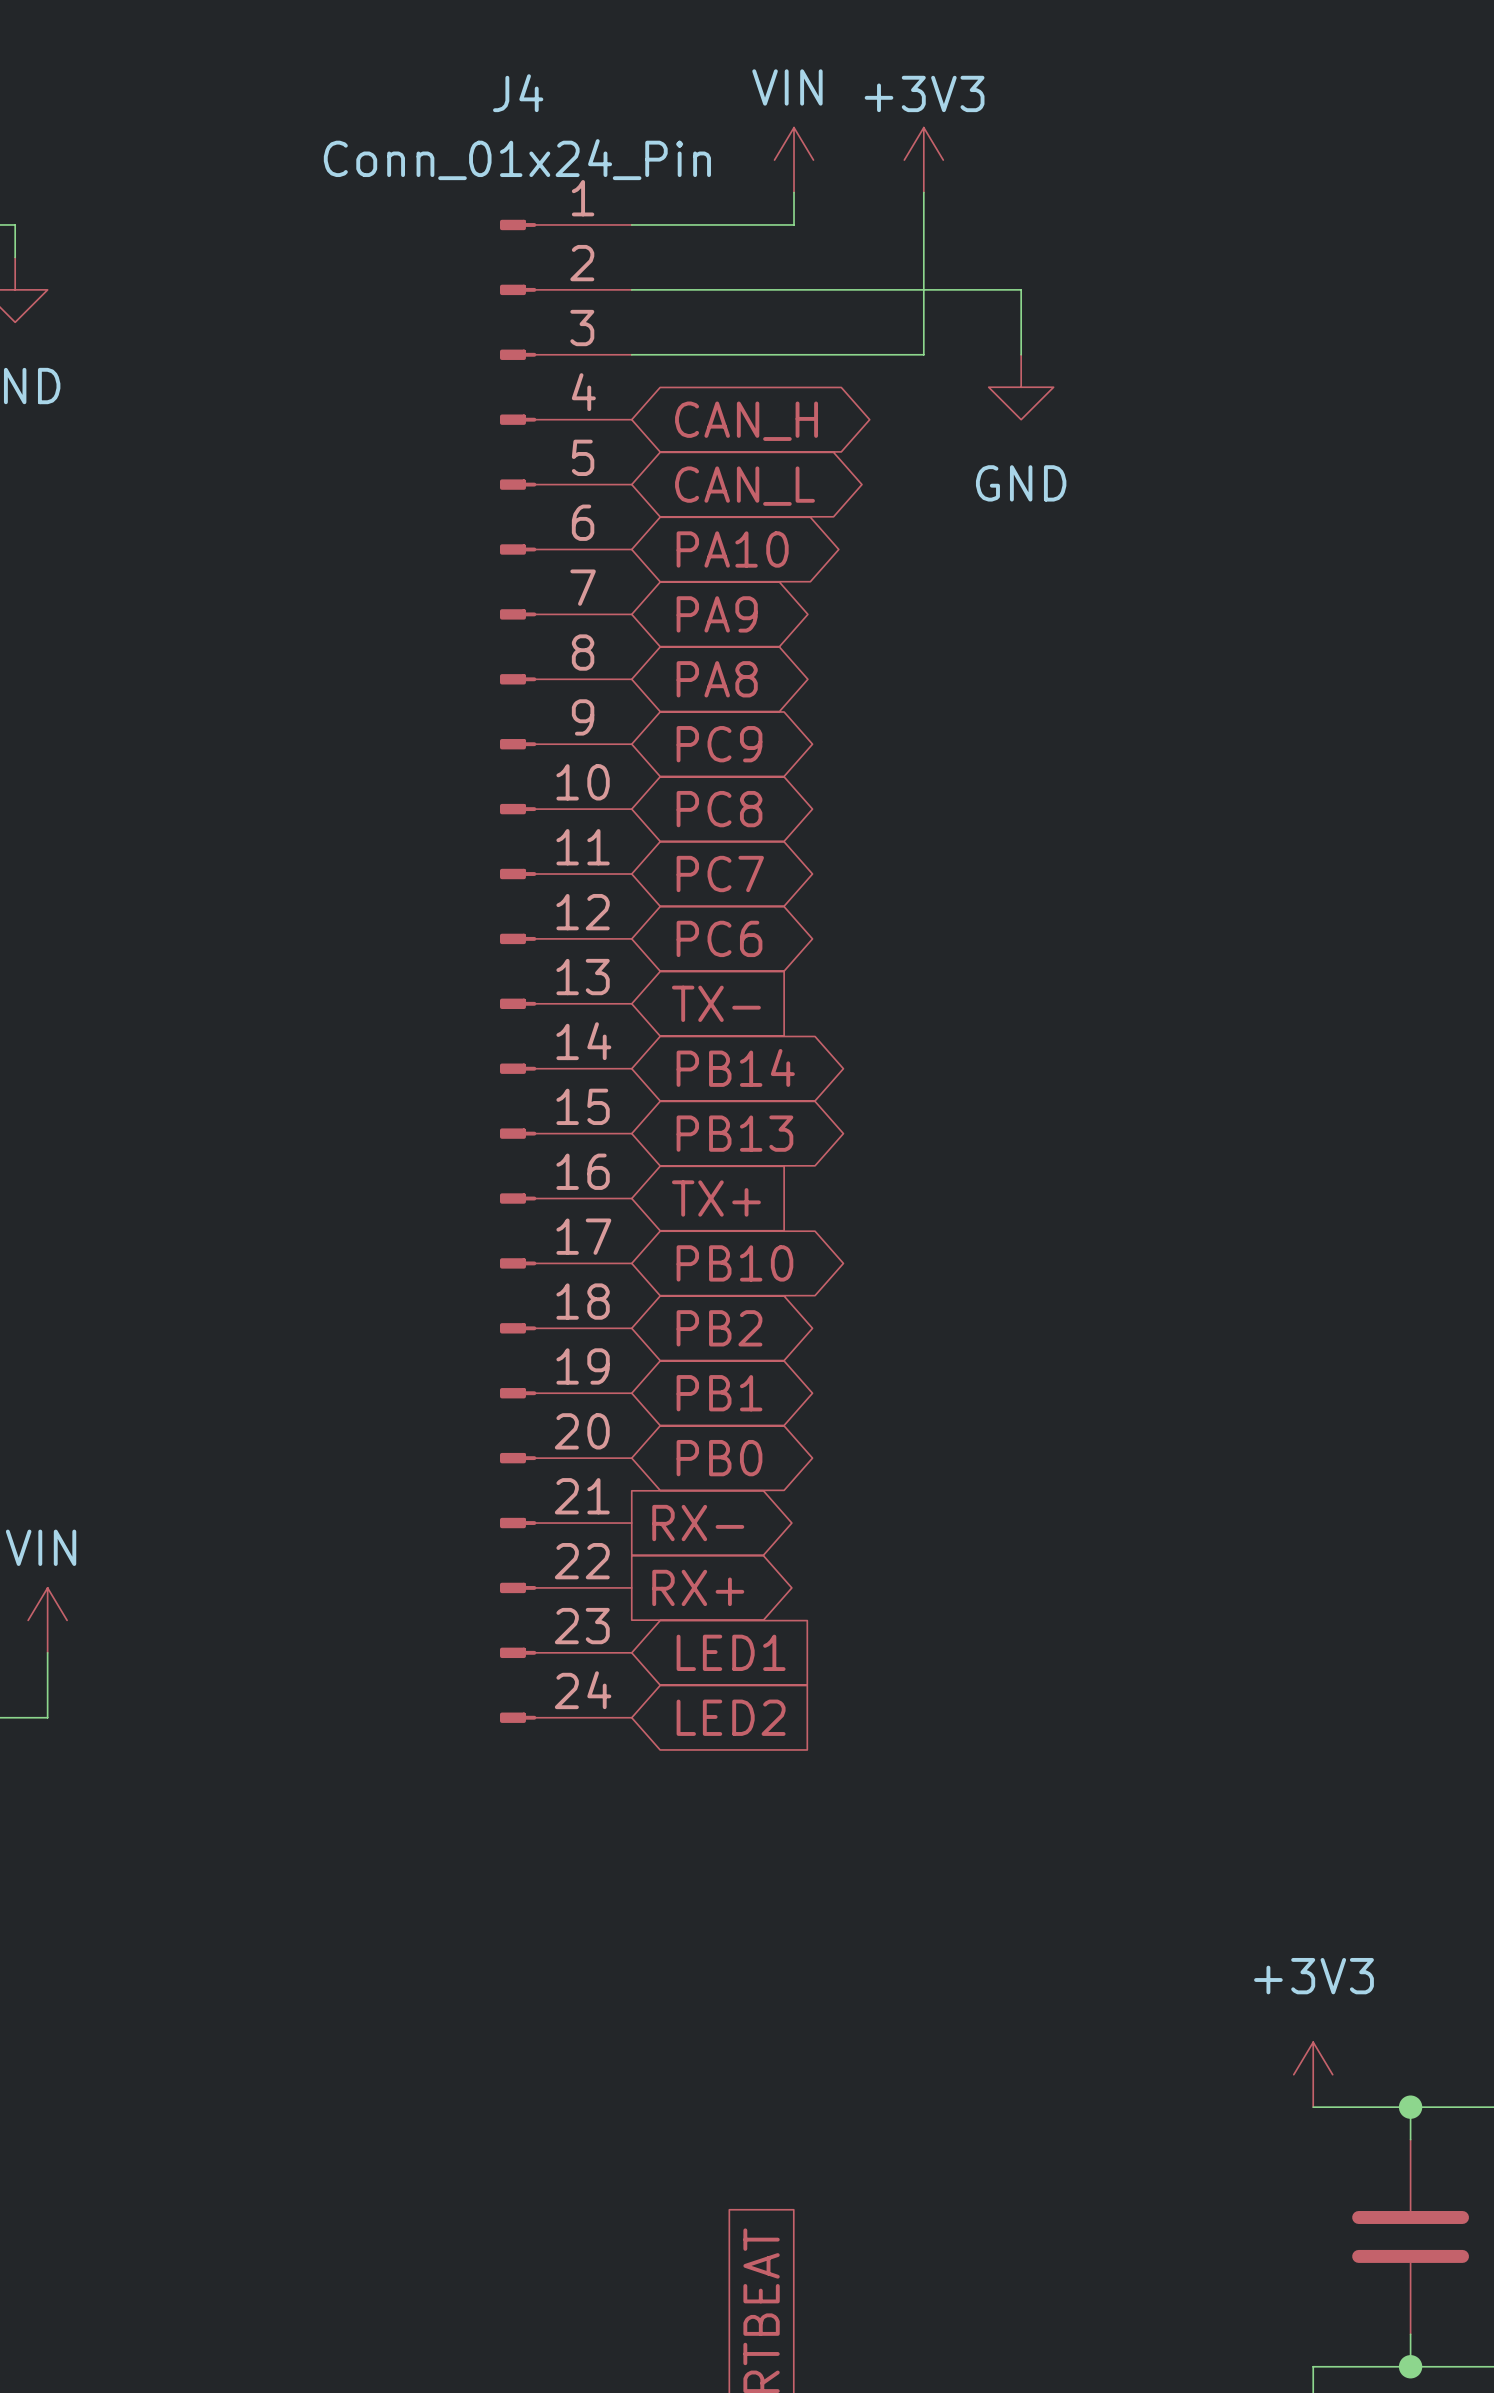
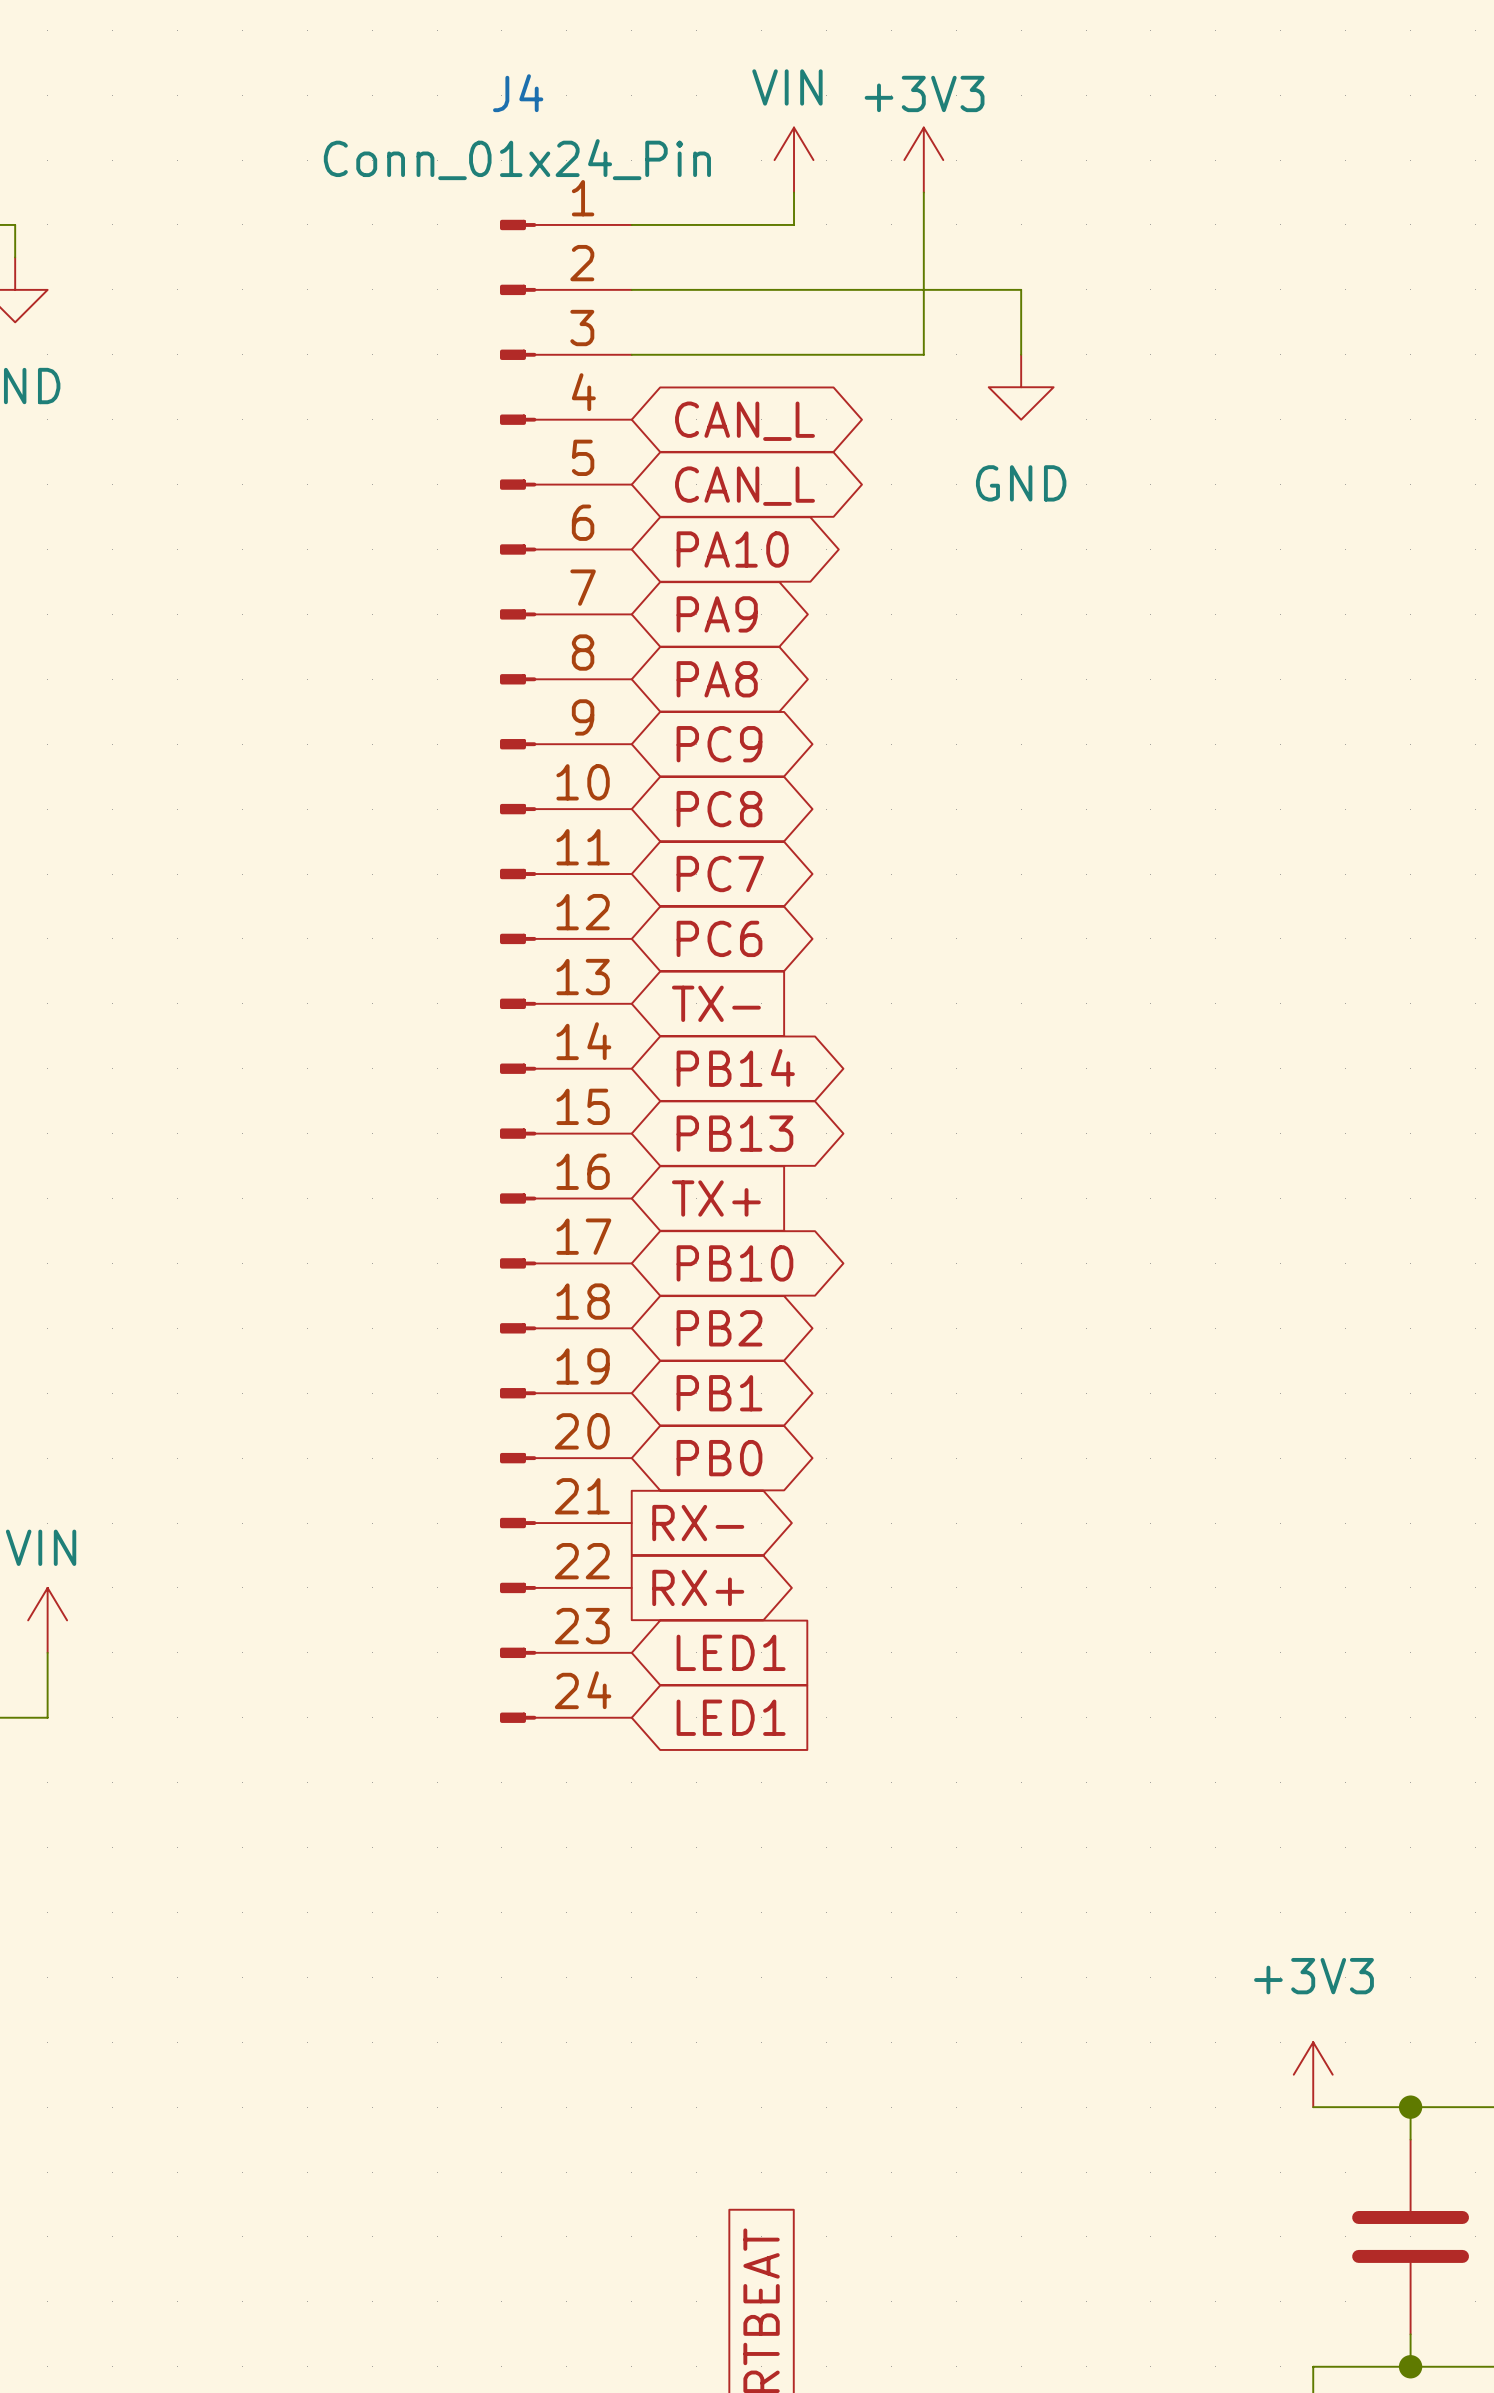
global label: CAN_H (746, 421) -> CAN_L (744, 421)
global label: LED2 (731, 1717) -> LED1 (731, 1717)

